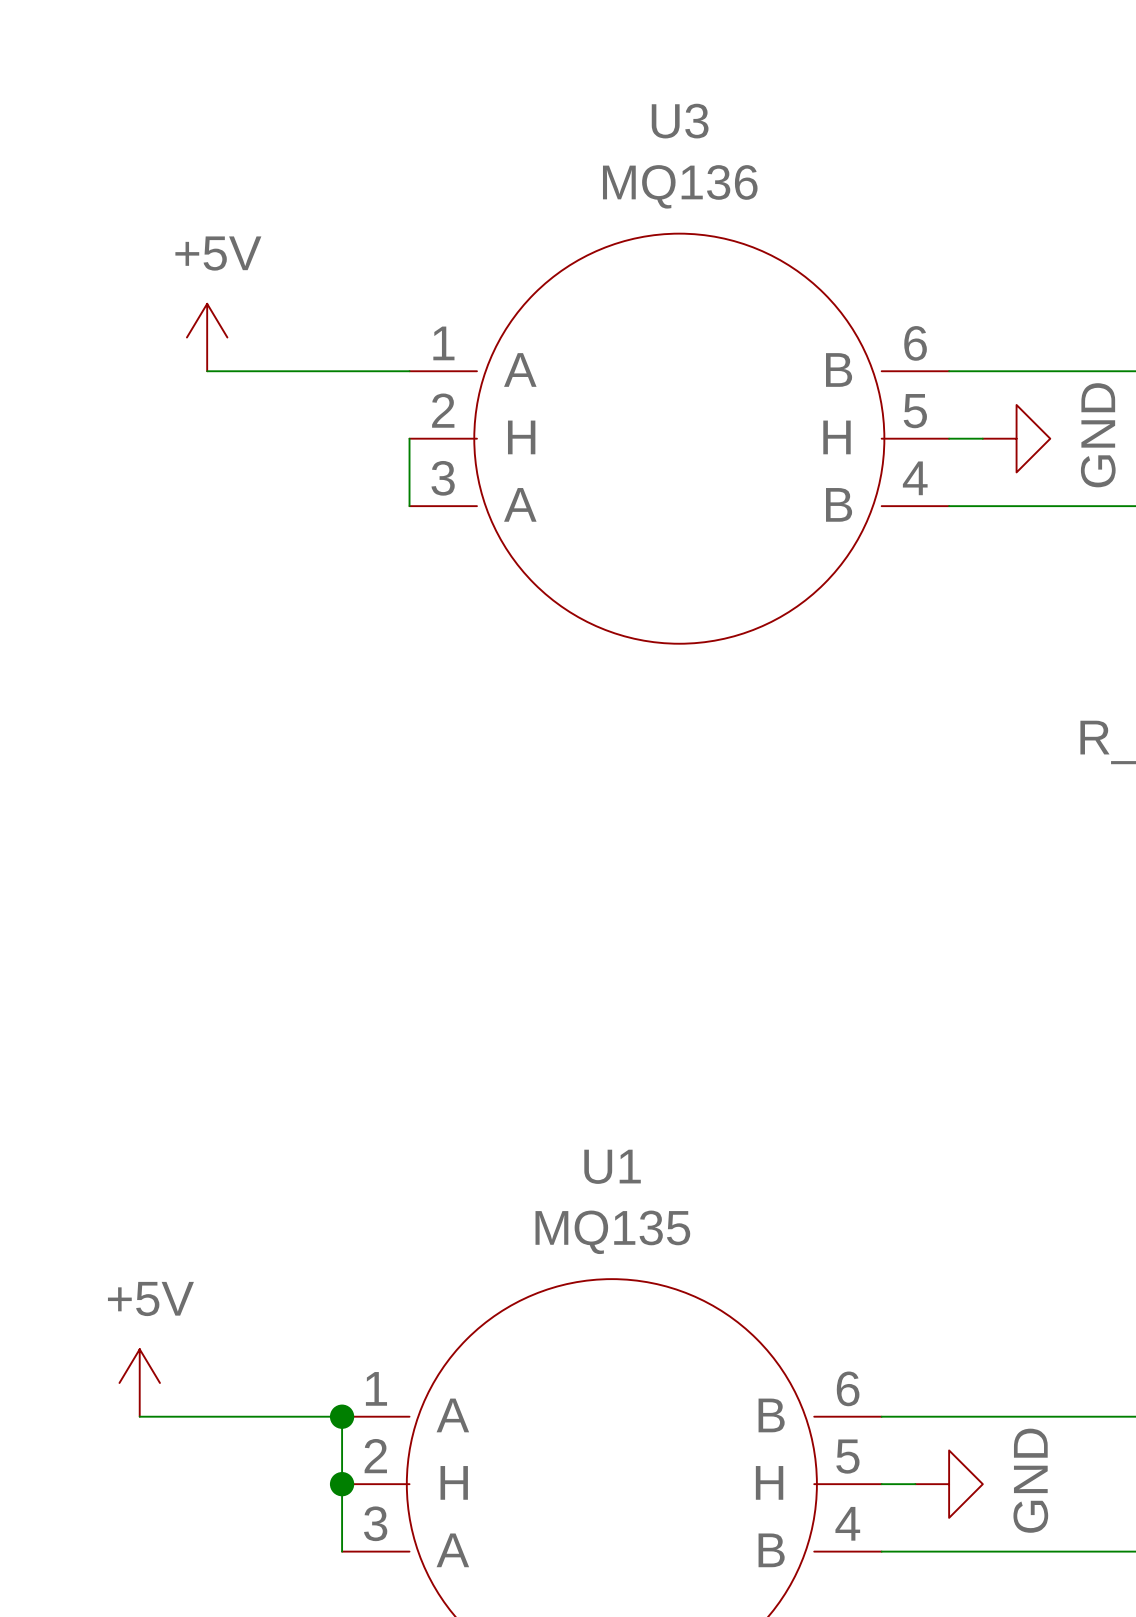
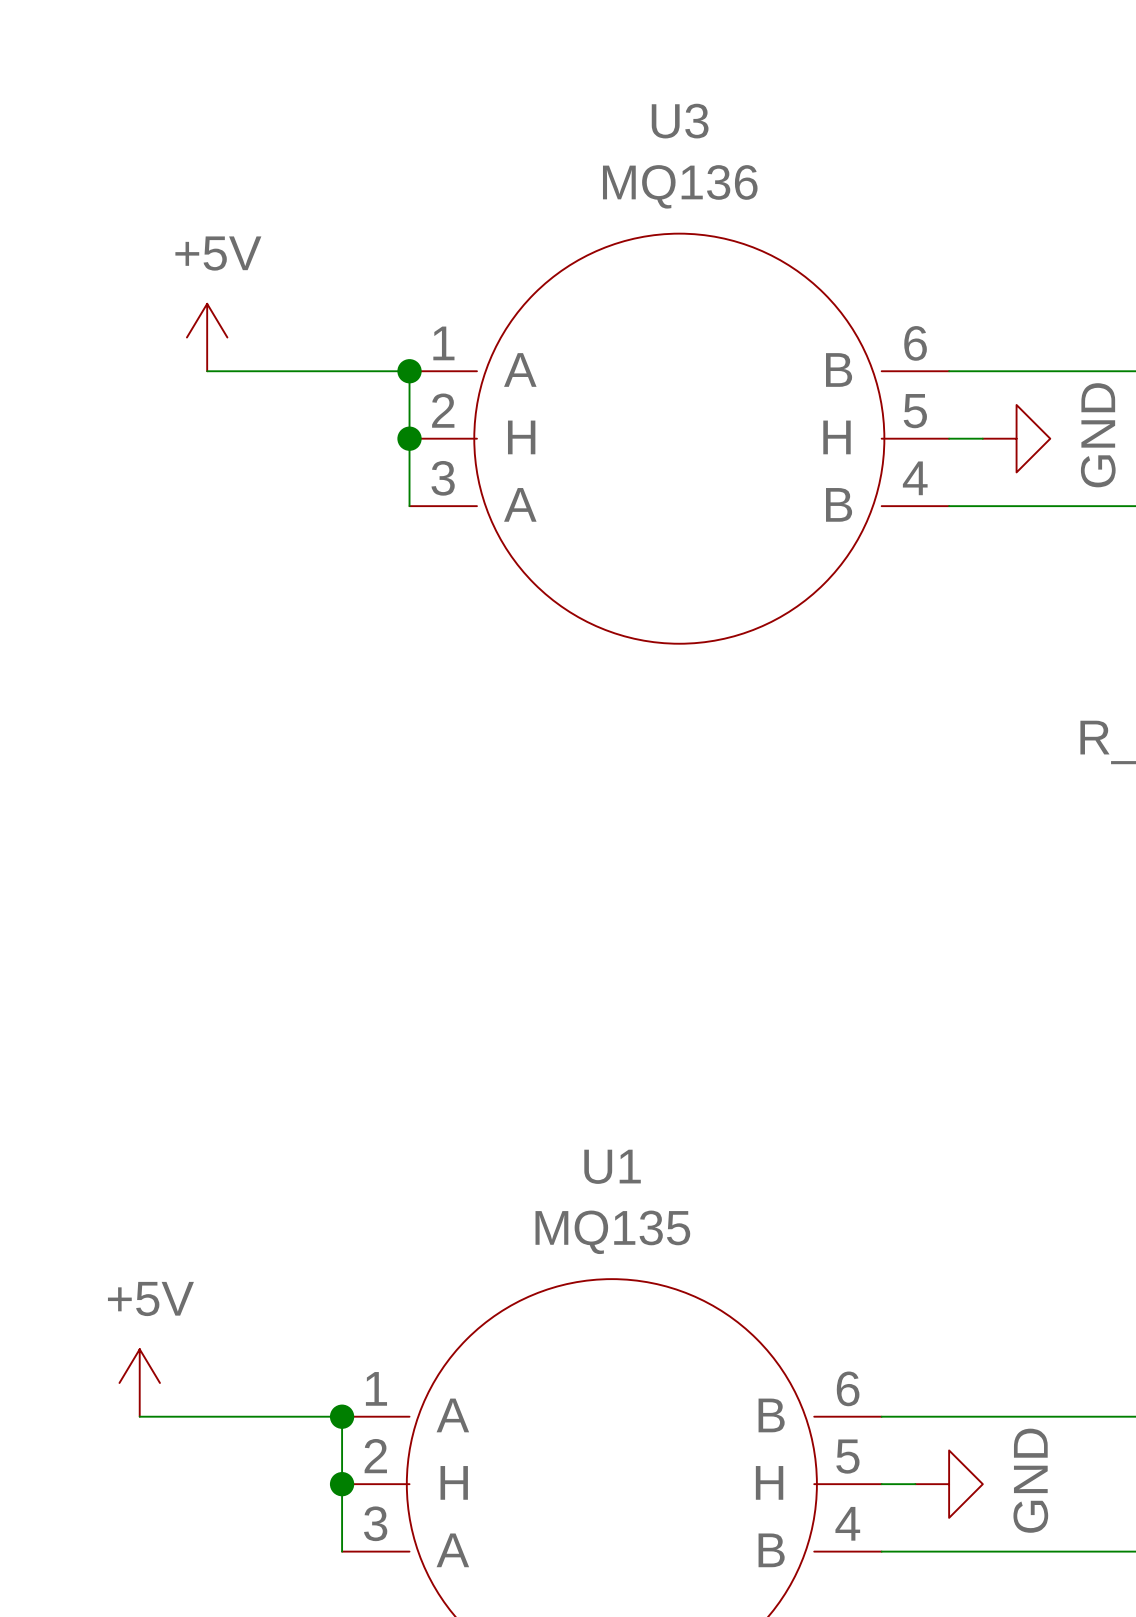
wire: none -> (409, 371) (409, 438)
junction: none -> (409, 371)
junction: none -> (409, 438)

